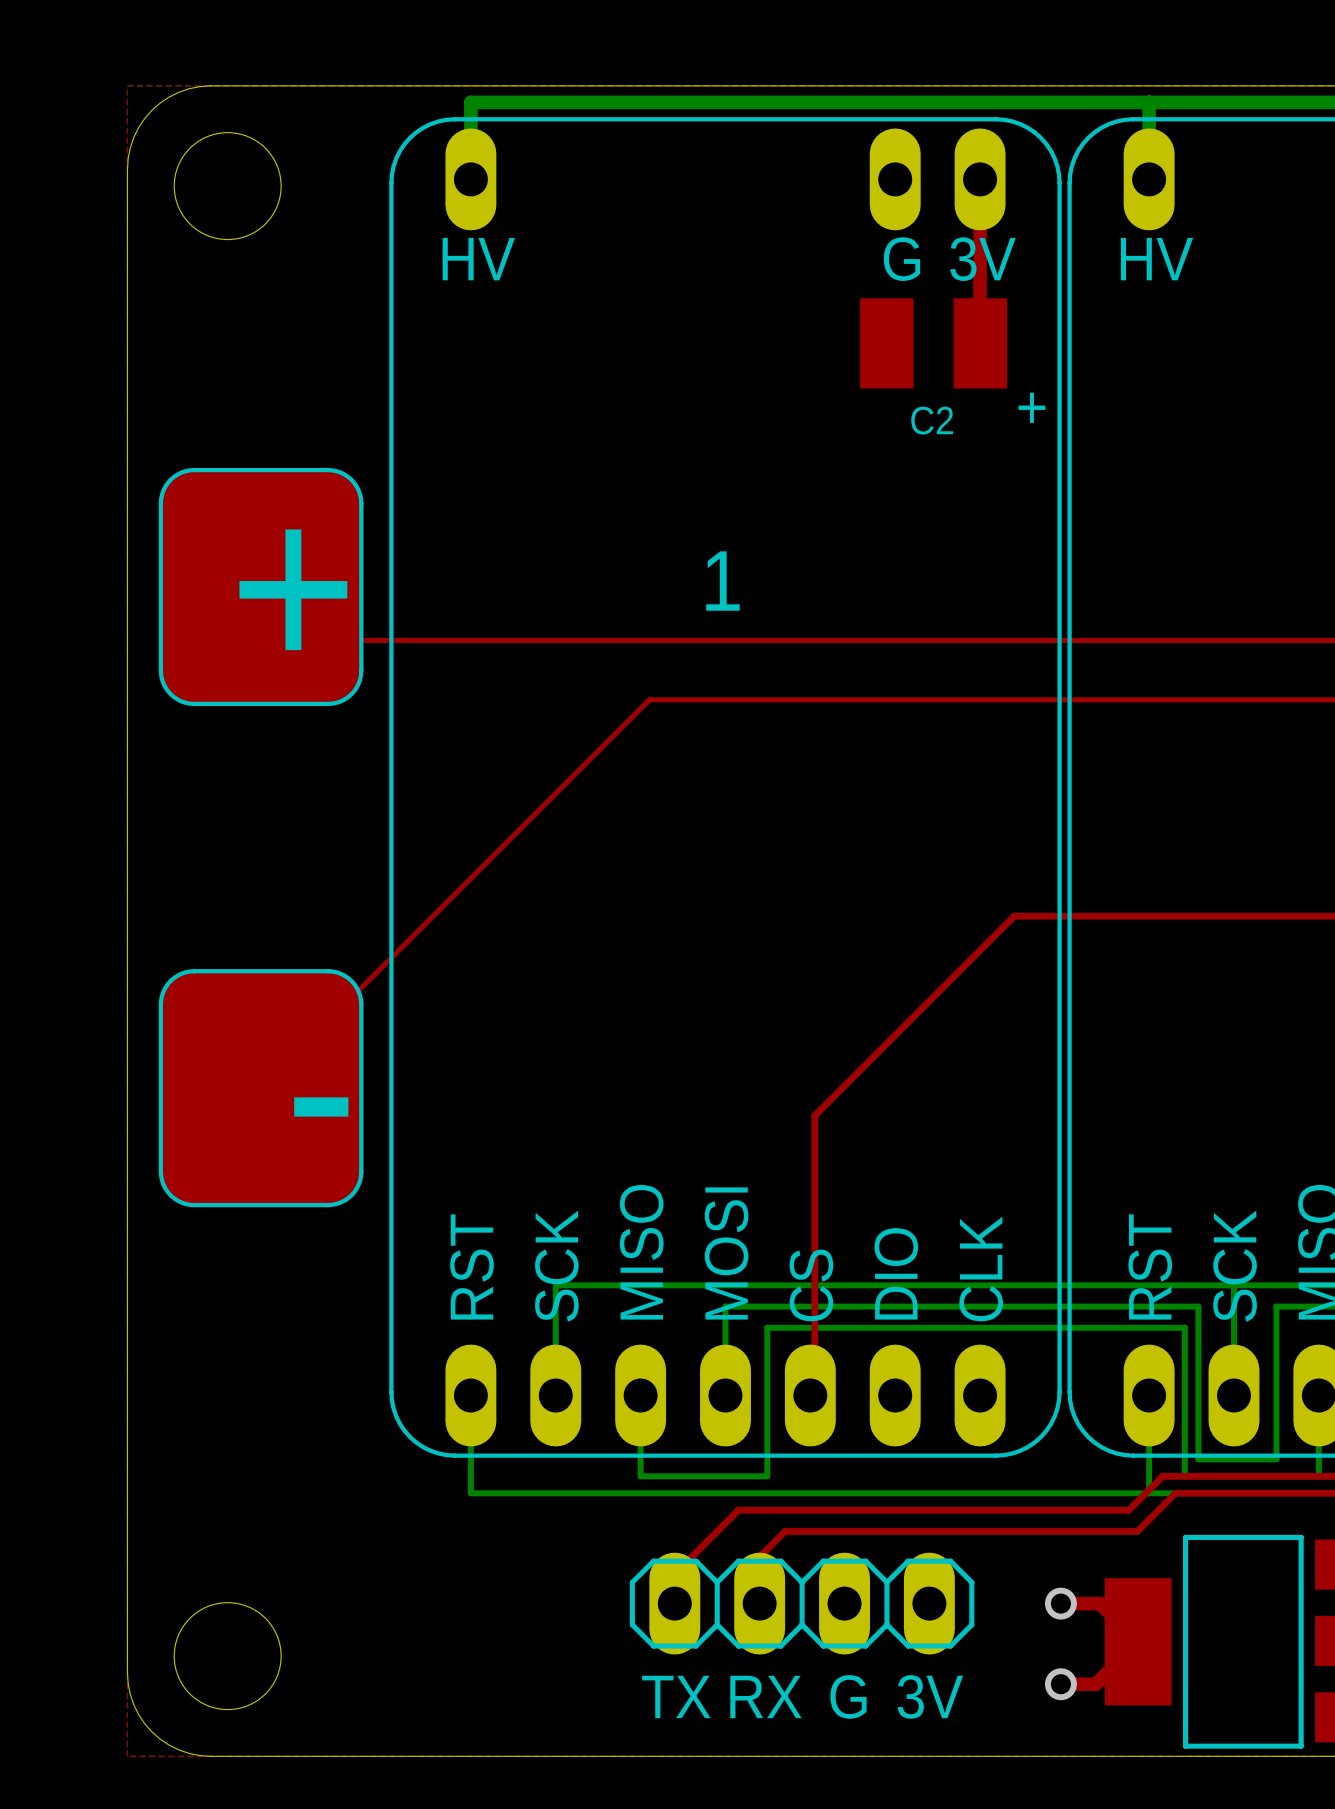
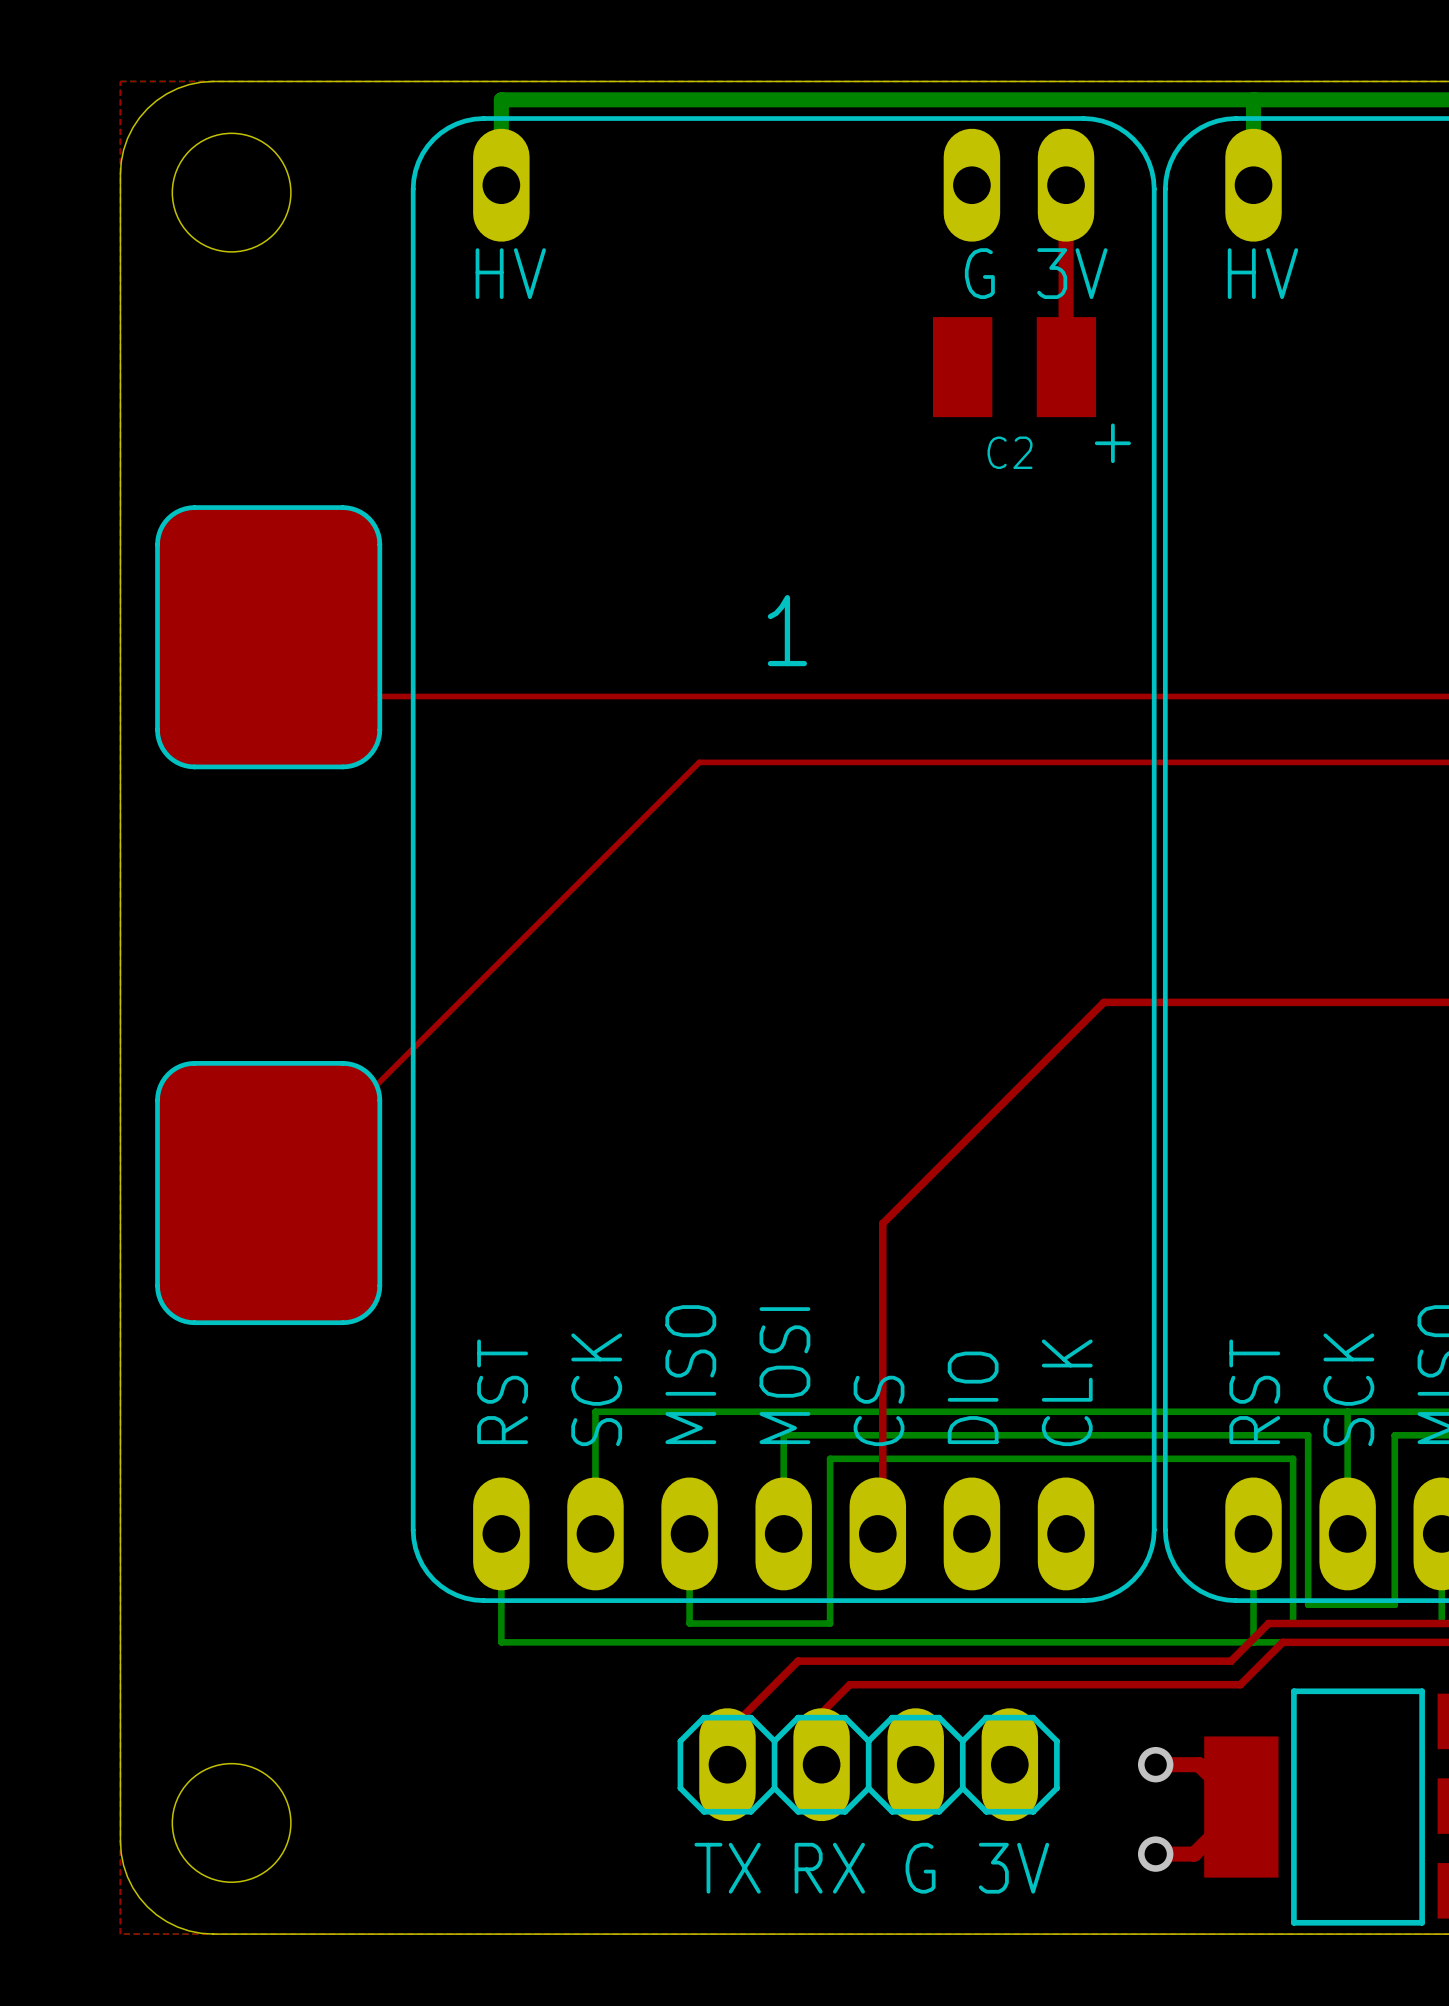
text: + (293, 589) -> none
text: - (321, 1106) -> none

